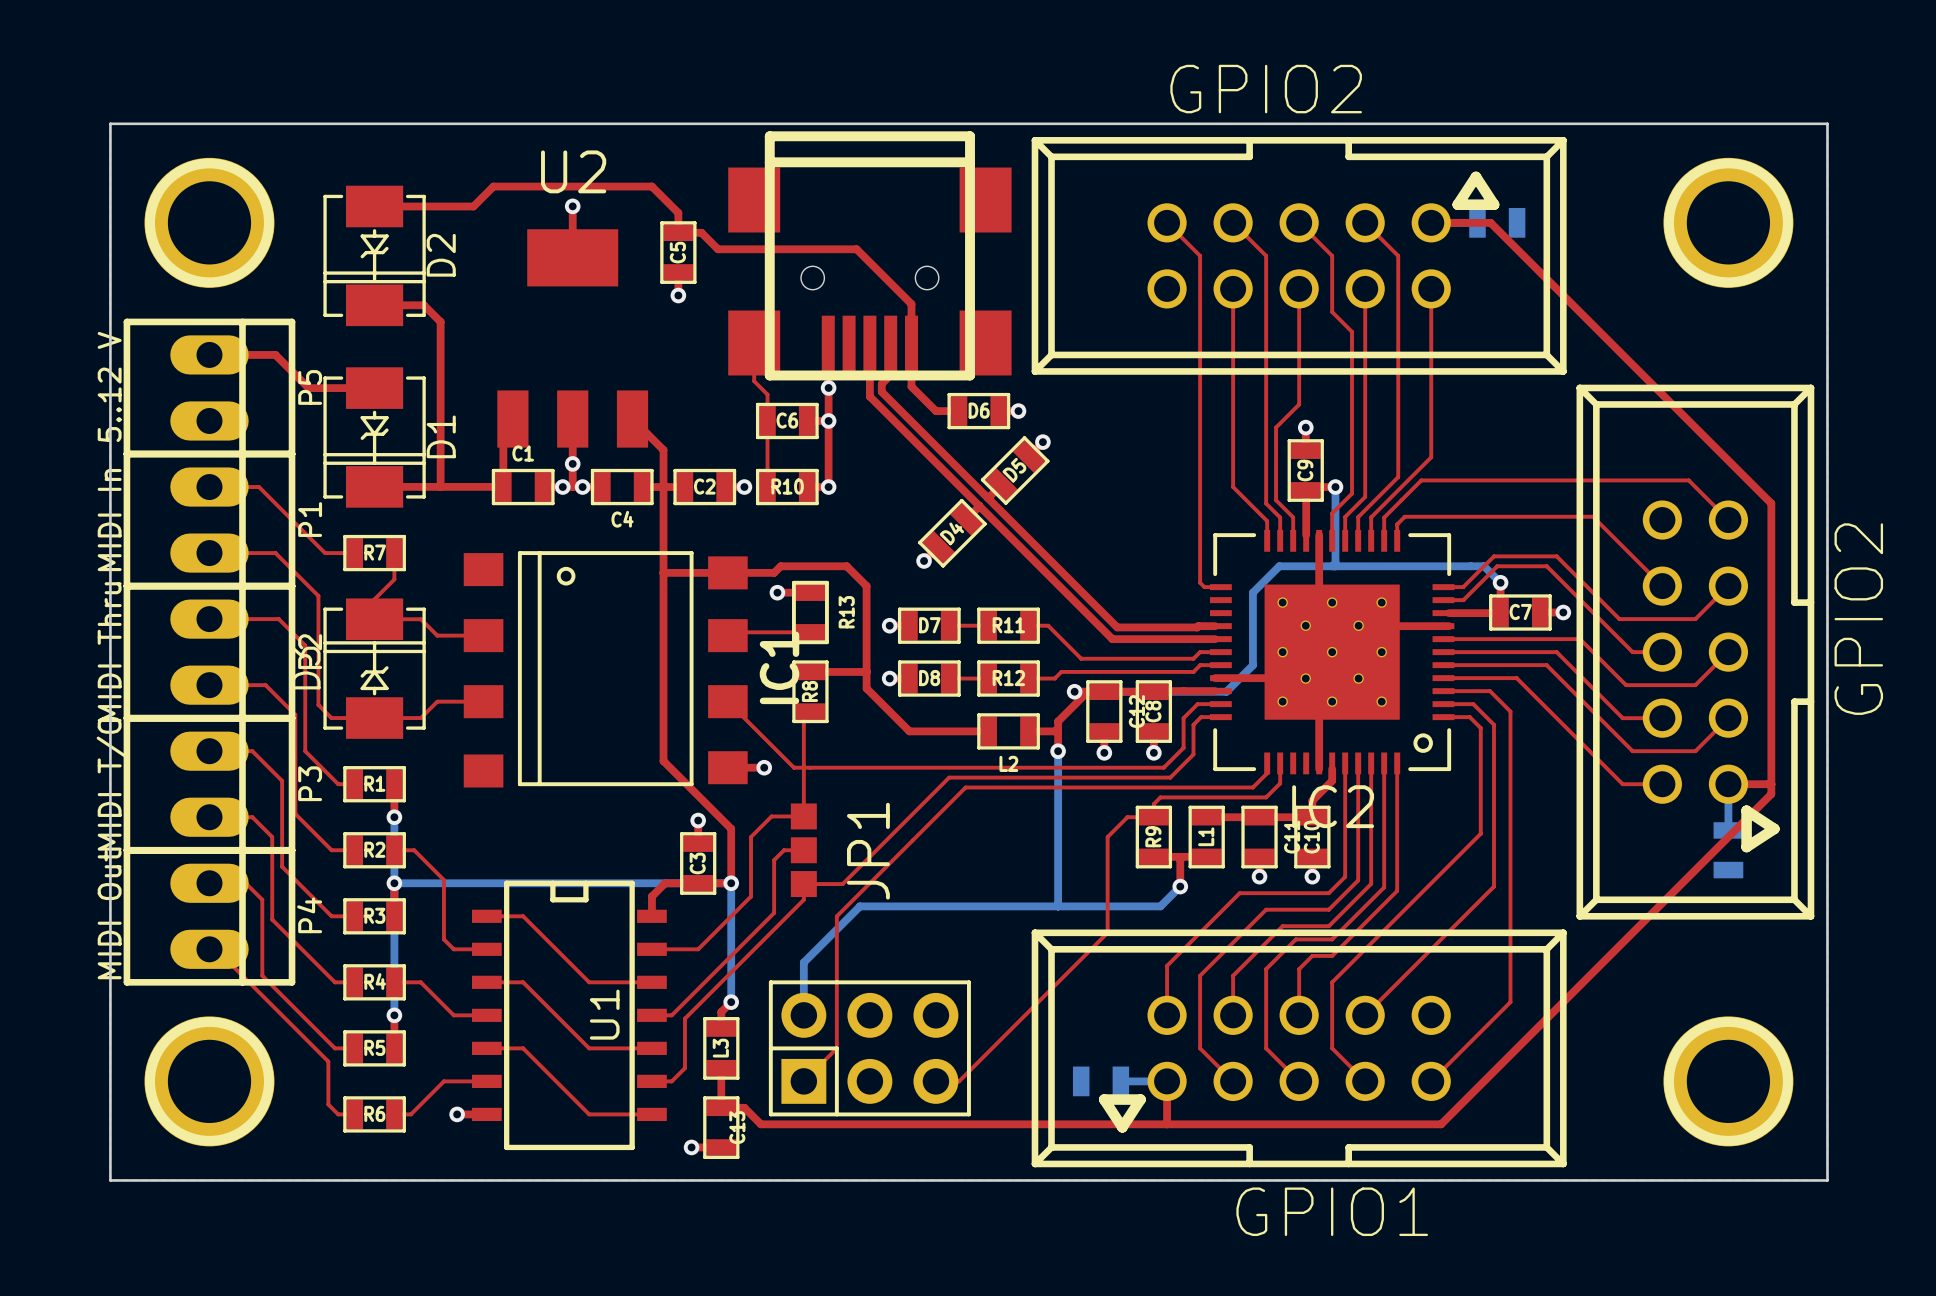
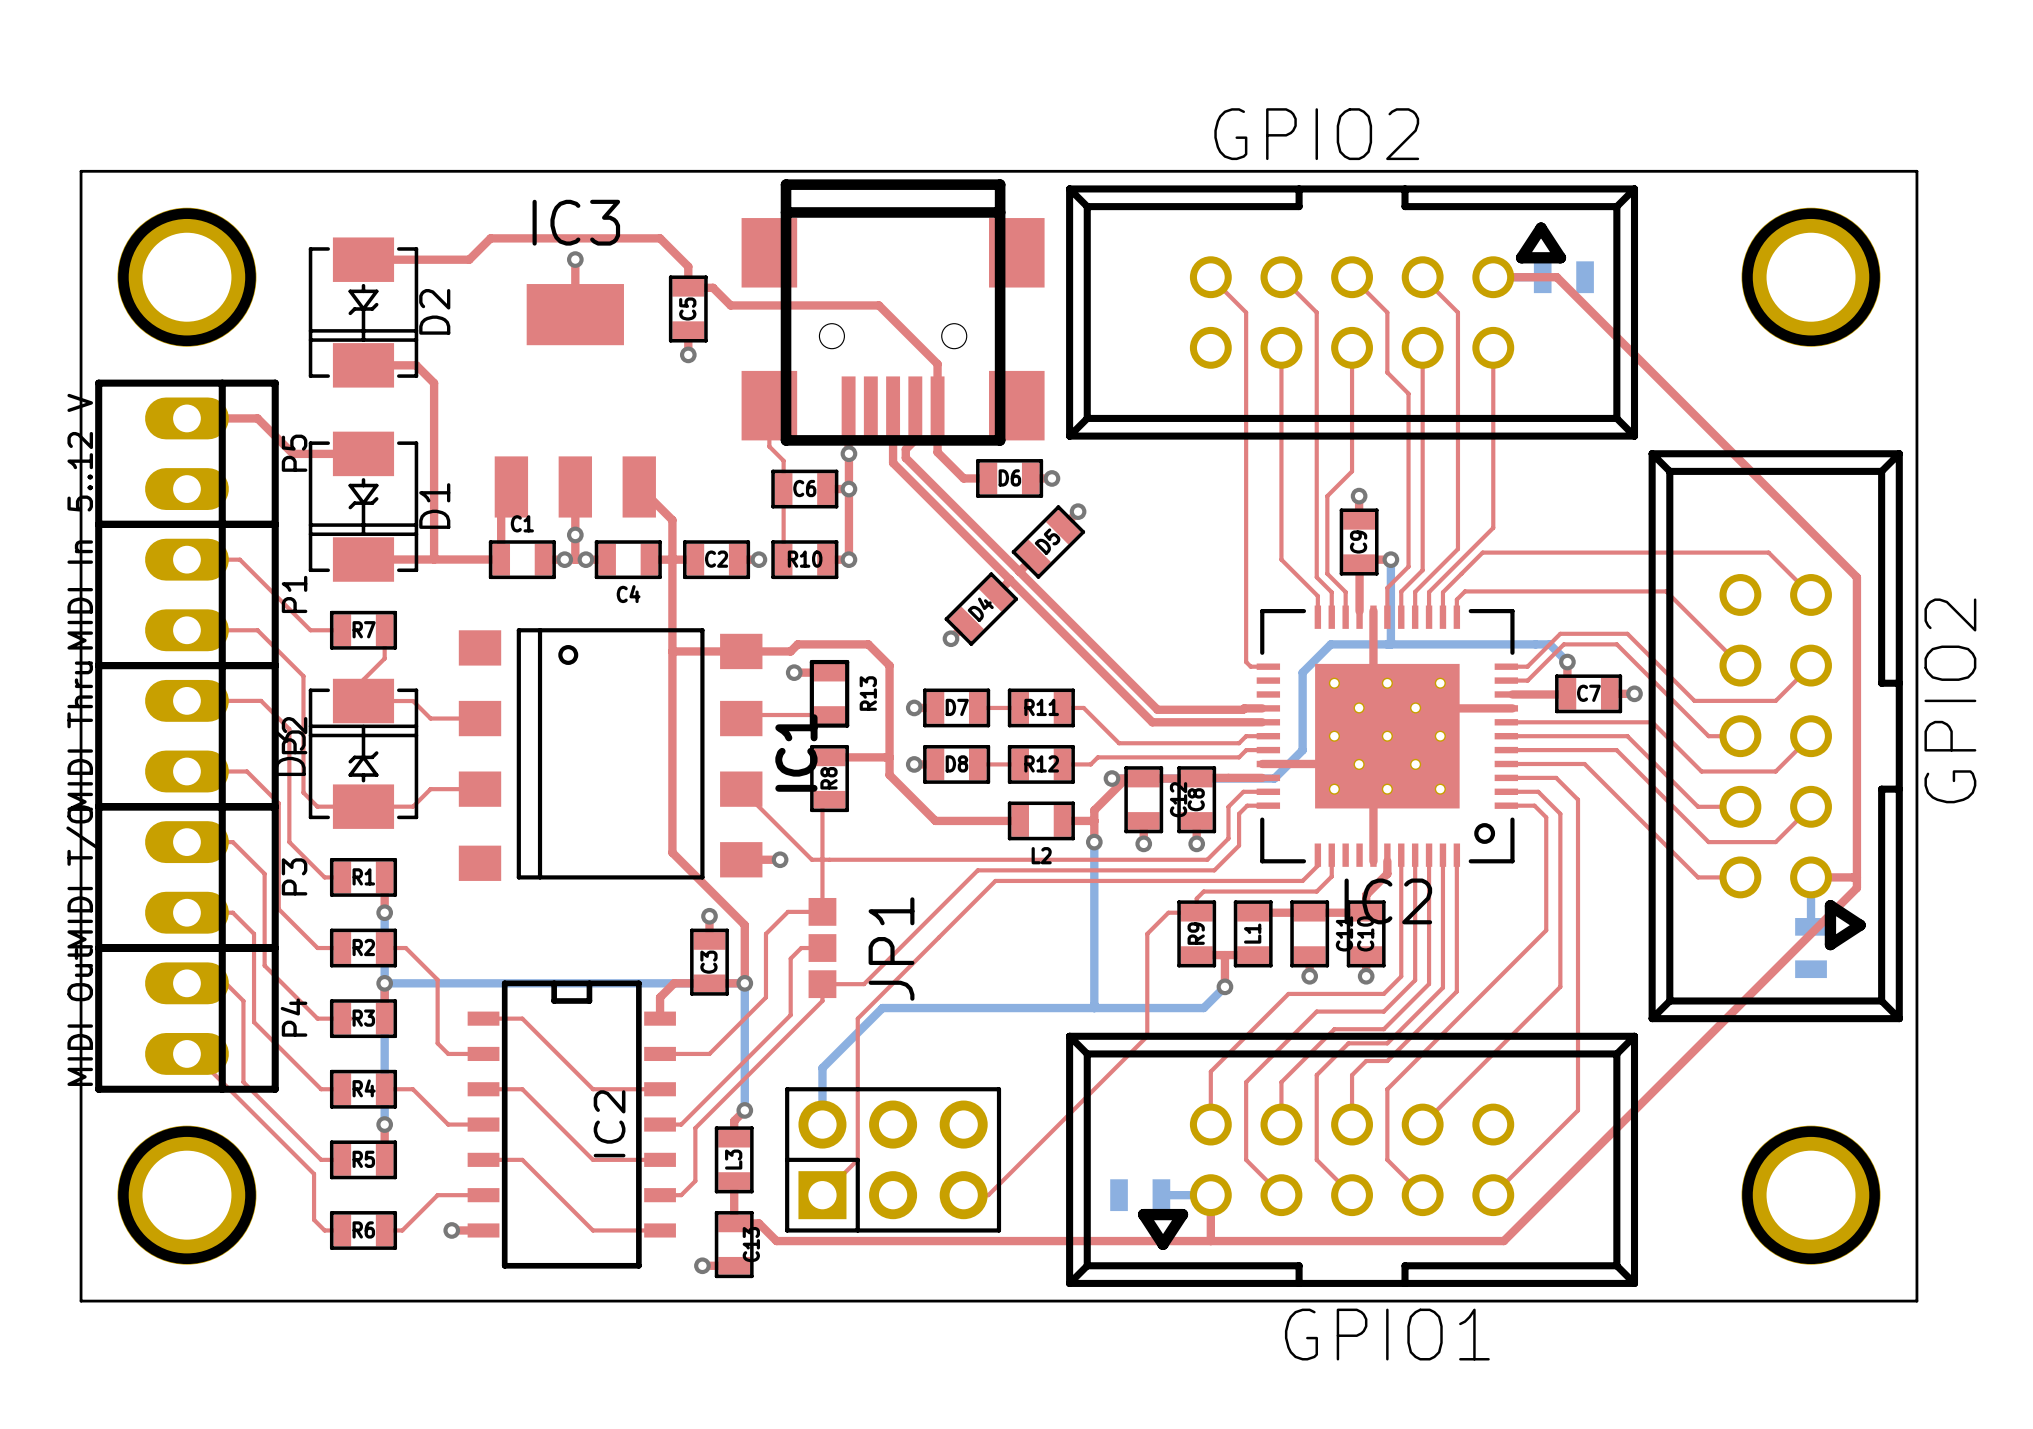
U2 name: U2 (573, 171) -> IC3 (576, 222)
U1 name: U1 (604, 1014) -> IC2 (609, 1123)

